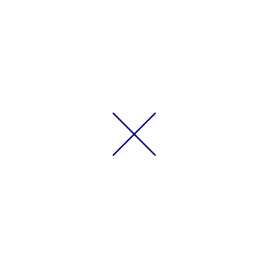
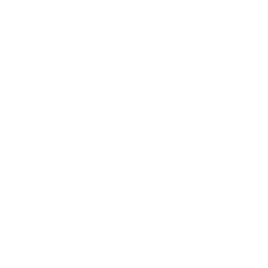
no-connect mark: (134, 134) -> none

